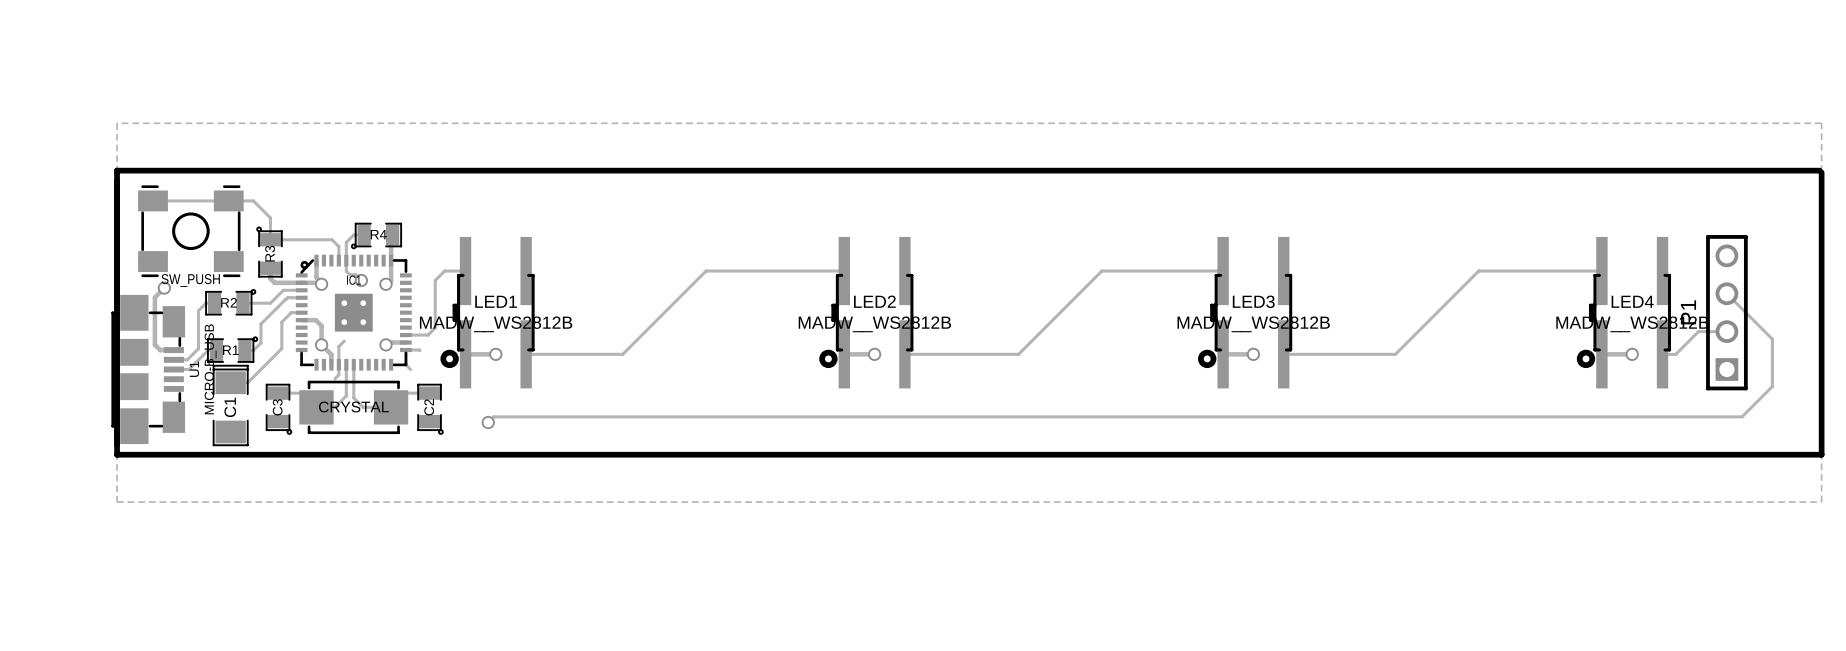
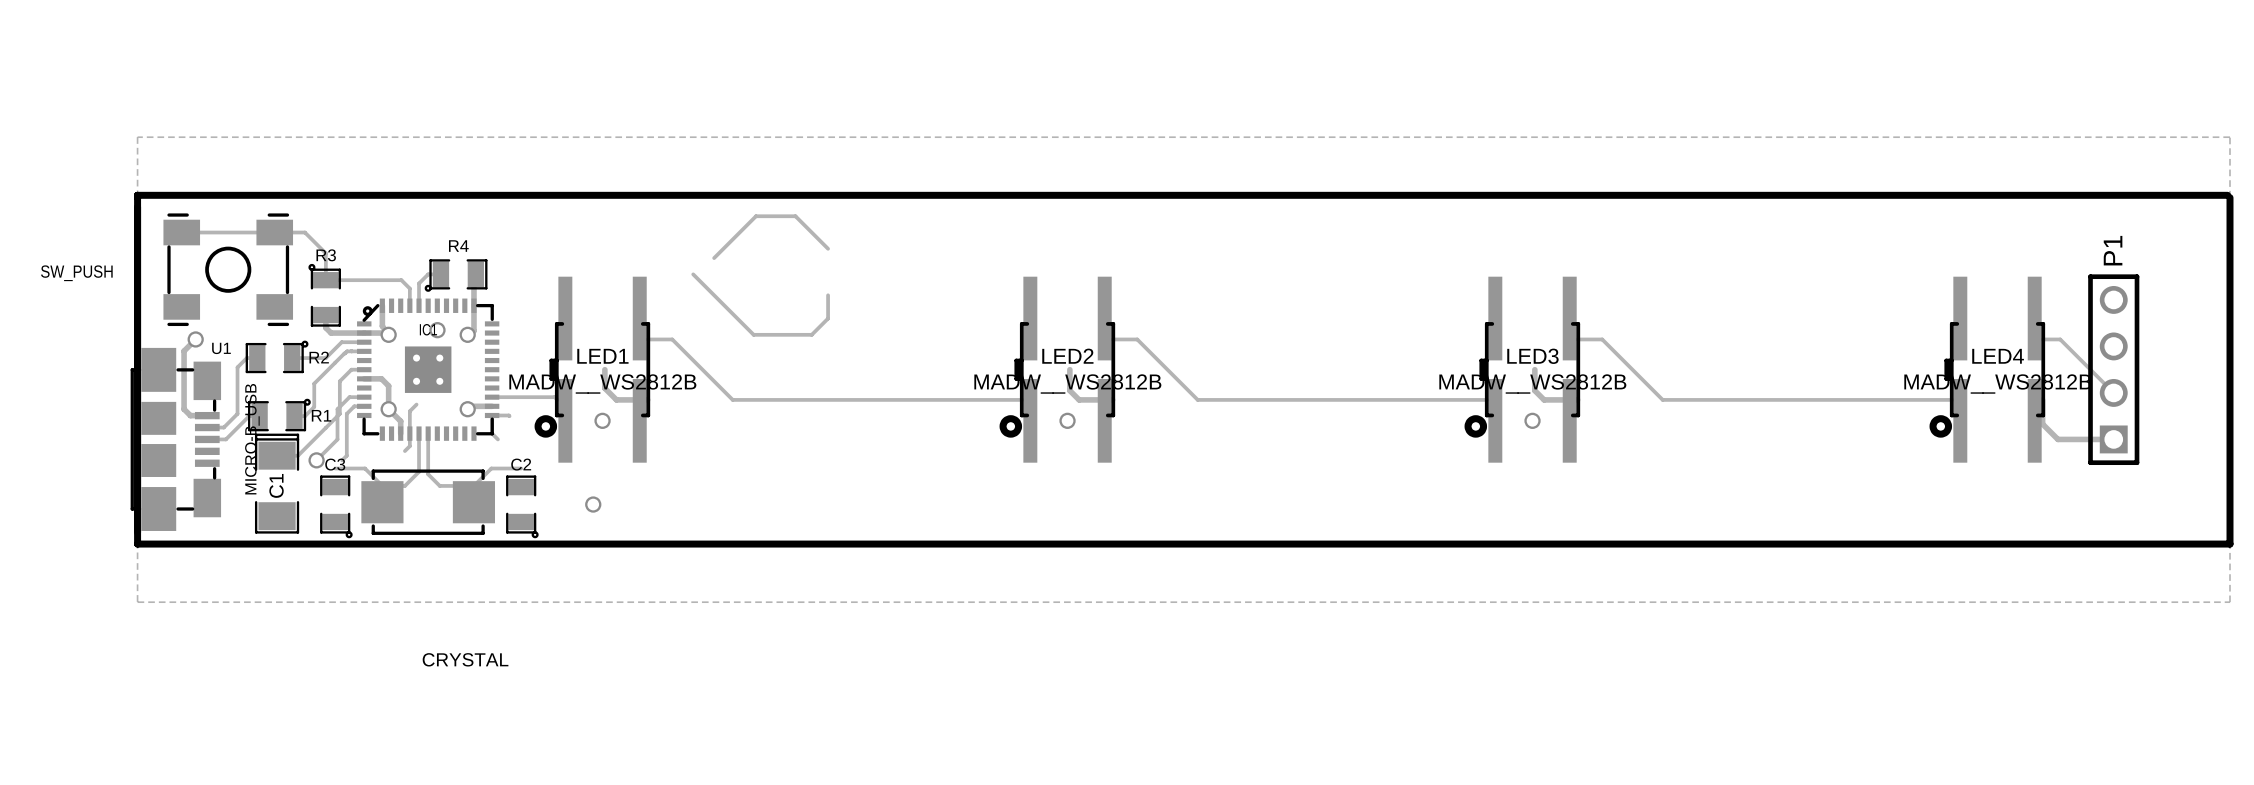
track: none -> (828, 248) (795, 216) (755, 216) (714, 258)
R4 name position: R4 (378, 234) -> R4 (458, 246)
track: none -> (693, 274) (753, 334) (811, 334) (828, 318) (828, 295)
R3 name rotation: 0° (270, 253) -> 90° clockwise (326, 255)
R3 name position: R3 (270, 253) -> R3 (326, 255)
track: (346, 260) (346, 271) (350, 274) (355, 274) (361, 280) -> none
track: (465, 271) (444, 271) (435, 280) (435, 327) (427, 335) -> (557, 399) (554, 397) (519, 397)
track: (844, 271) (706, 271) (622, 354) (526, 354) -> none
track: (1223, 271) (1101, 271) (1018, 354) (904, 354) -> none
track: (1601, 271) (1478, 271) (1395, 354) (1283, 354) -> none
part value position: SW_PUSH (190, 280) -> SW_PUSH (76, 273)
track: none -> (647, 339) (672, 339) (732, 399) (1022, 399)
track: none -> (1112, 339) (1137, 339) (1197, 399) (1487, 399)
track: none -> (1577, 339) (1602, 339) (1662, 399) (1952, 399)
track: (1726, 293) (1772, 339) (1772, 386) (1742, 416) (493, 416) (488, 422) -> none
R2 name position: R2 (229, 302) -> R2 (319, 357)
track: none -> (604, 369) (604, 388) (616, 399) (647, 399)
track: none -> (1069, 369) (1069, 390) (1079, 399) (1112, 399)
track: none -> (1534, 369) (1534, 390) (1544, 399) (1577, 399)
P1 name position: P1 (1688, 312) -> P1 (2113, 250)
track: (1726, 331) (1698, 331) (1675, 354) (1662, 354) -> (2113, 392) (2060, 339) (2042, 339)
track: none -> (364, 397) (349, 397) (337, 409) (337, 439) (316, 460)
track: none -> (2042, 399) (2042, 424) (2057, 439) (2113, 439)
track: none -> (364, 406) (354, 406) (346, 413) (346, 455) (342, 460)
R1 name position: R1 (230, 350) -> R1 (321, 415)
track: (465, 354) (495, 354) -> none
track: (844, 354) (874, 354) -> none
track: (1223, 354) (1253, 354) -> none
track: (1601, 354) (1632, 354) -> none
via: (1632, 354) -> none
U1 name rotation: 0° (194, 369) -> 90° clockwise (221, 348)
U1 name position: U1 (194, 369) -> U1 (221, 348)
via: none -> (316, 460)
part value position: CRYSTAL (353, 406) -> CRYSTAL (465, 659)
C3 name rotation: 0° (277, 407) -> 90° clockwise (335, 464)
part position: (353, 407) -> (428, 502)
C2 name rotation: 0° (429, 407) -> 90° clockwise (521, 464)
C3 position: (278, 409) -> (336, 506)
C2 position: (430, 409) -> (522, 506)

